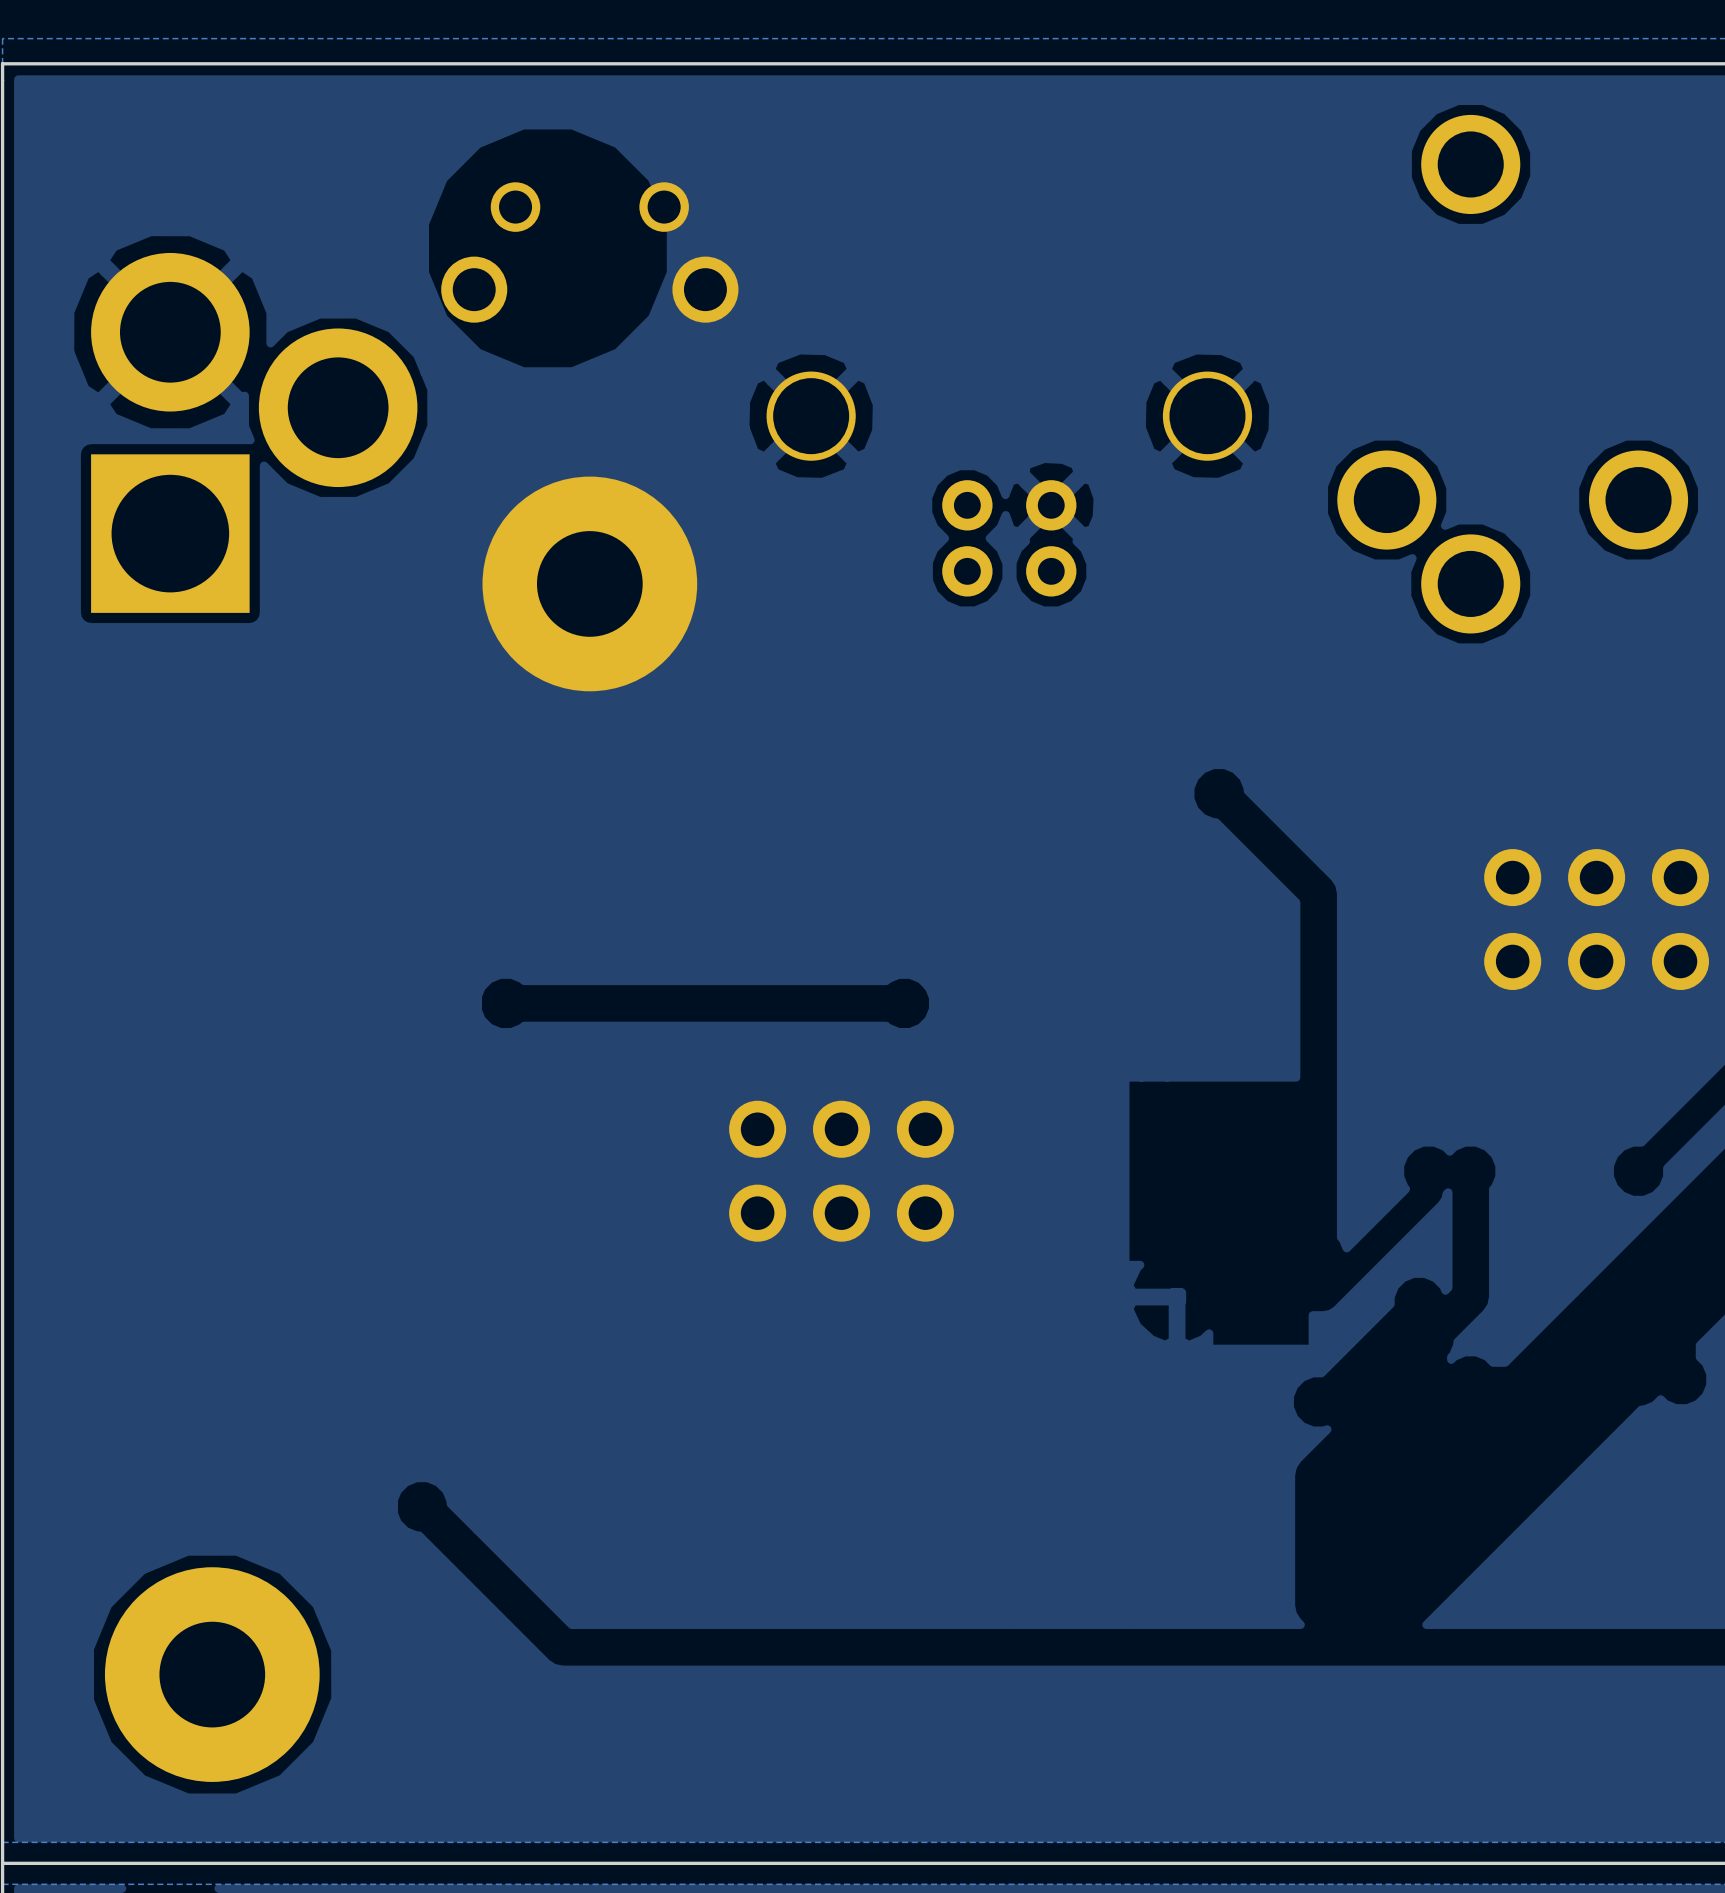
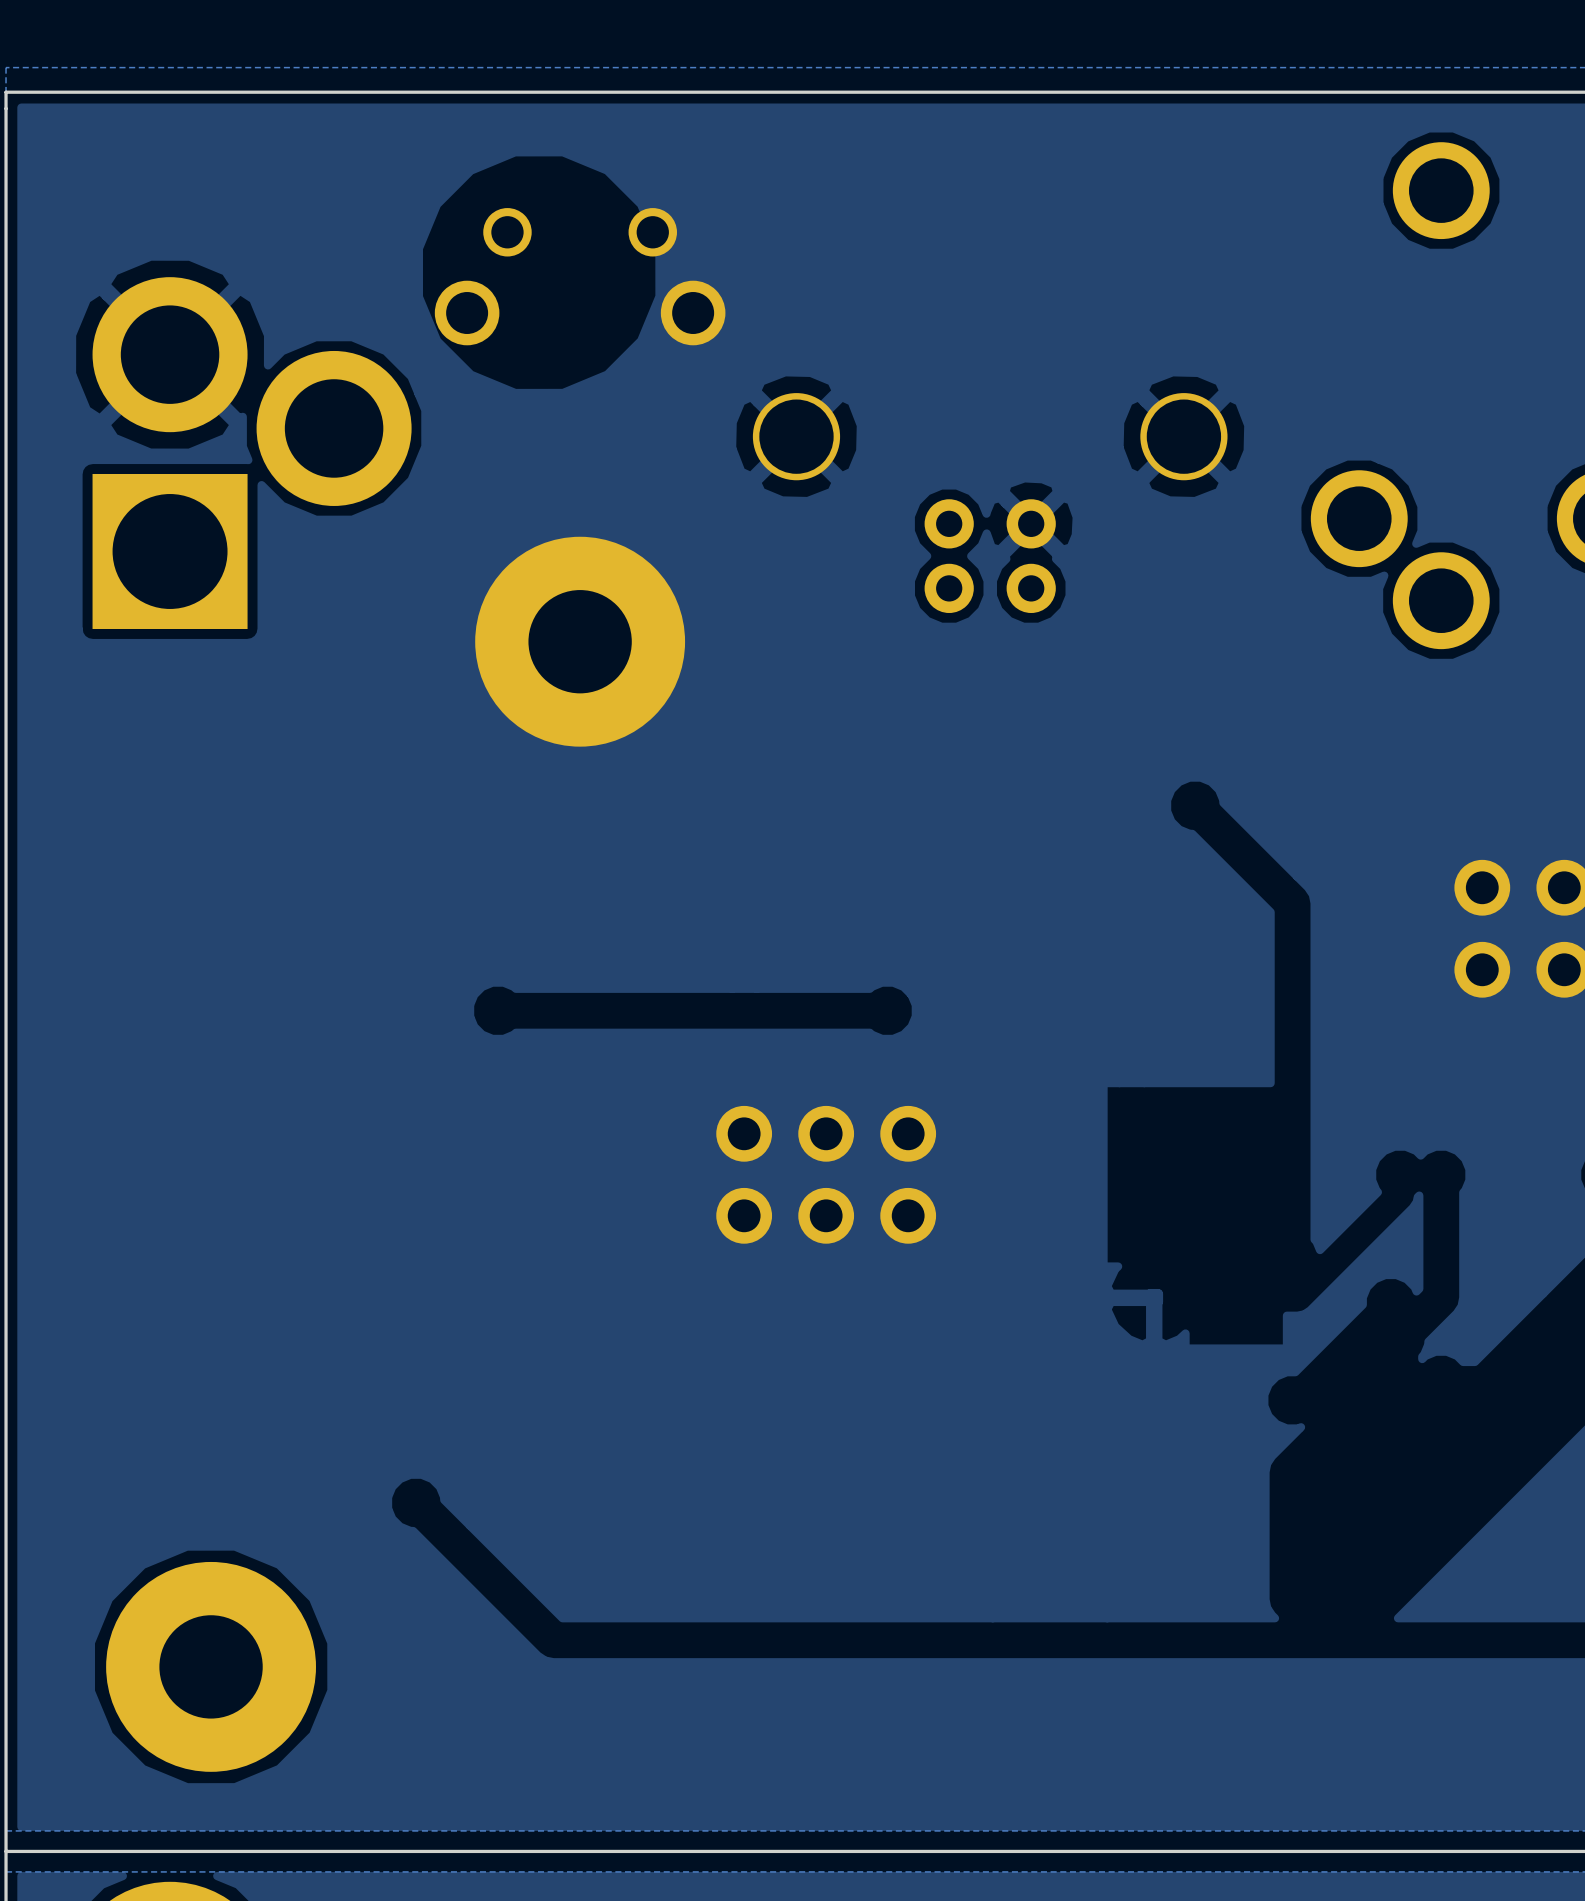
part position: (589, 583) -> (580, 641)

